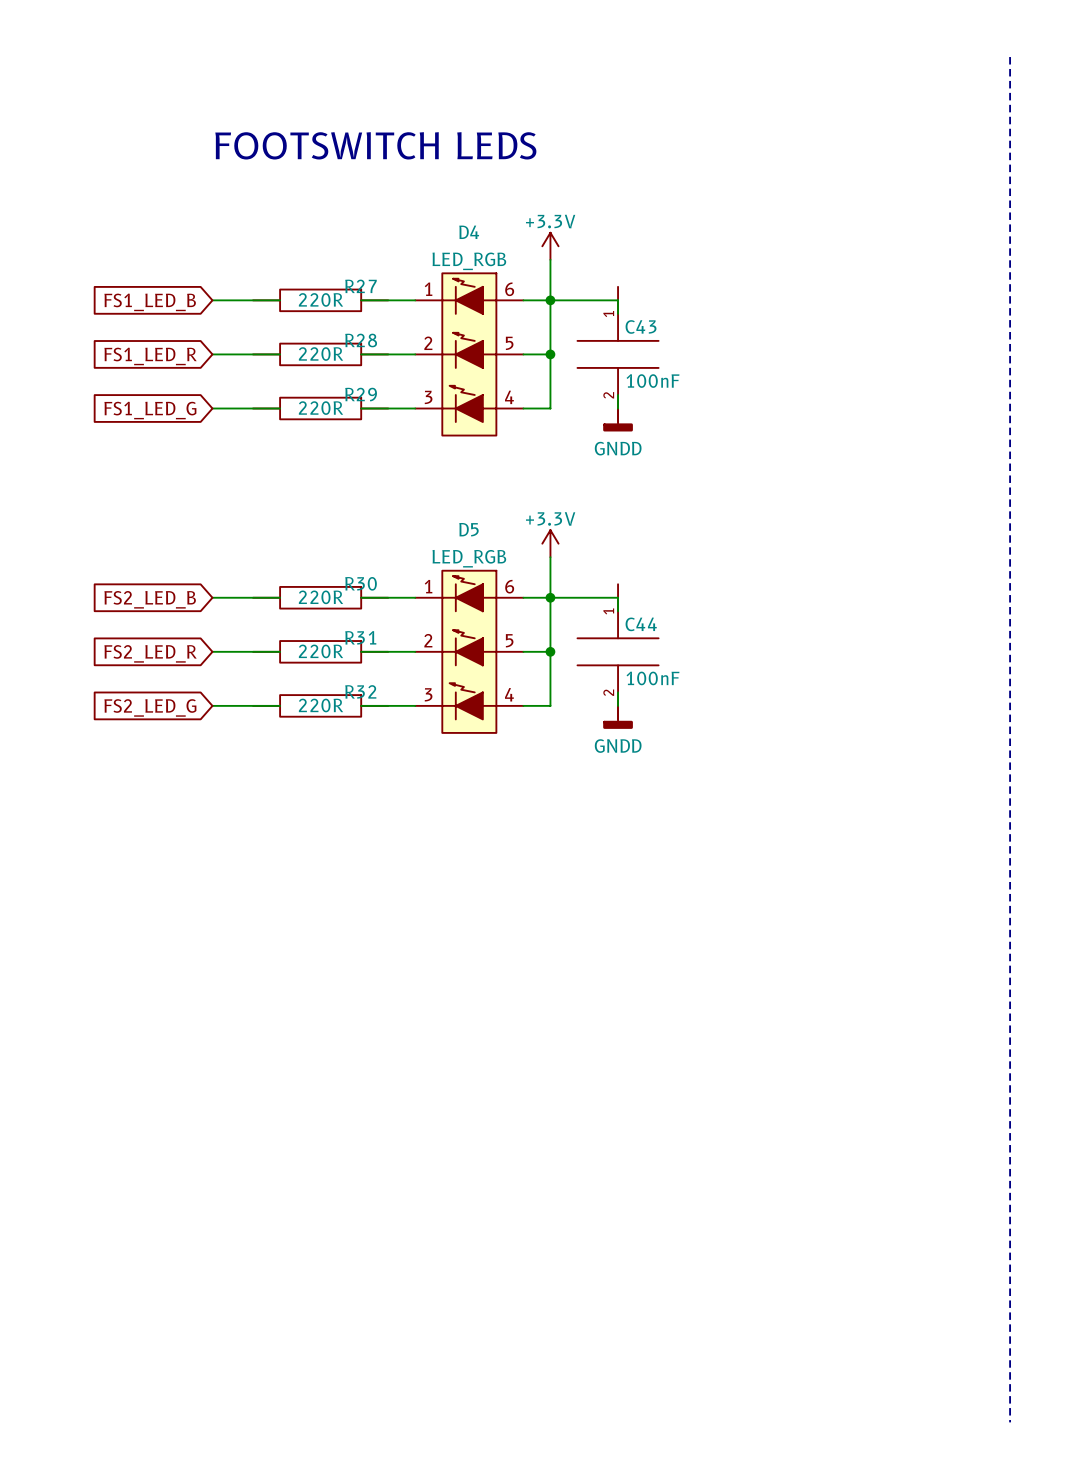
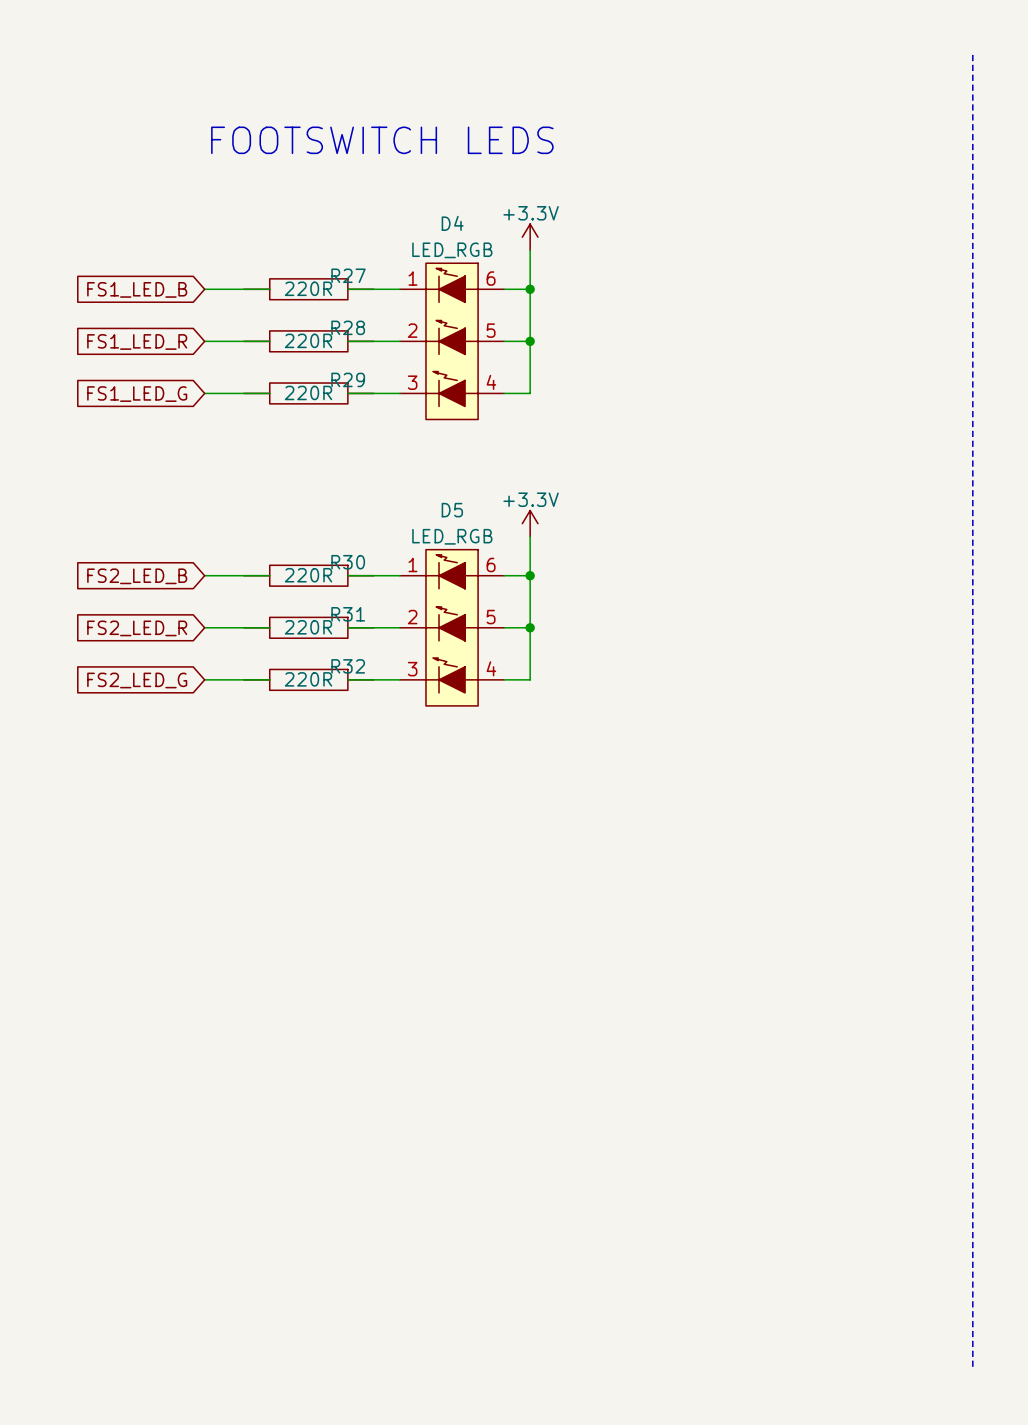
wire: (550, 300) (618, 300) (618, 313) -> none
C43: 100nF (618, 354) -> none
wire: (618, 394) (618, 408) -> none
power symbol: GNDD (618, 419) -> none
wire: (550, 597) (618, 597) (618, 611) -> none
C44: 100nF (618, 651) -> none
wire: (618, 692) (618, 705) -> none
power symbol: GNDD (618, 717) -> none

